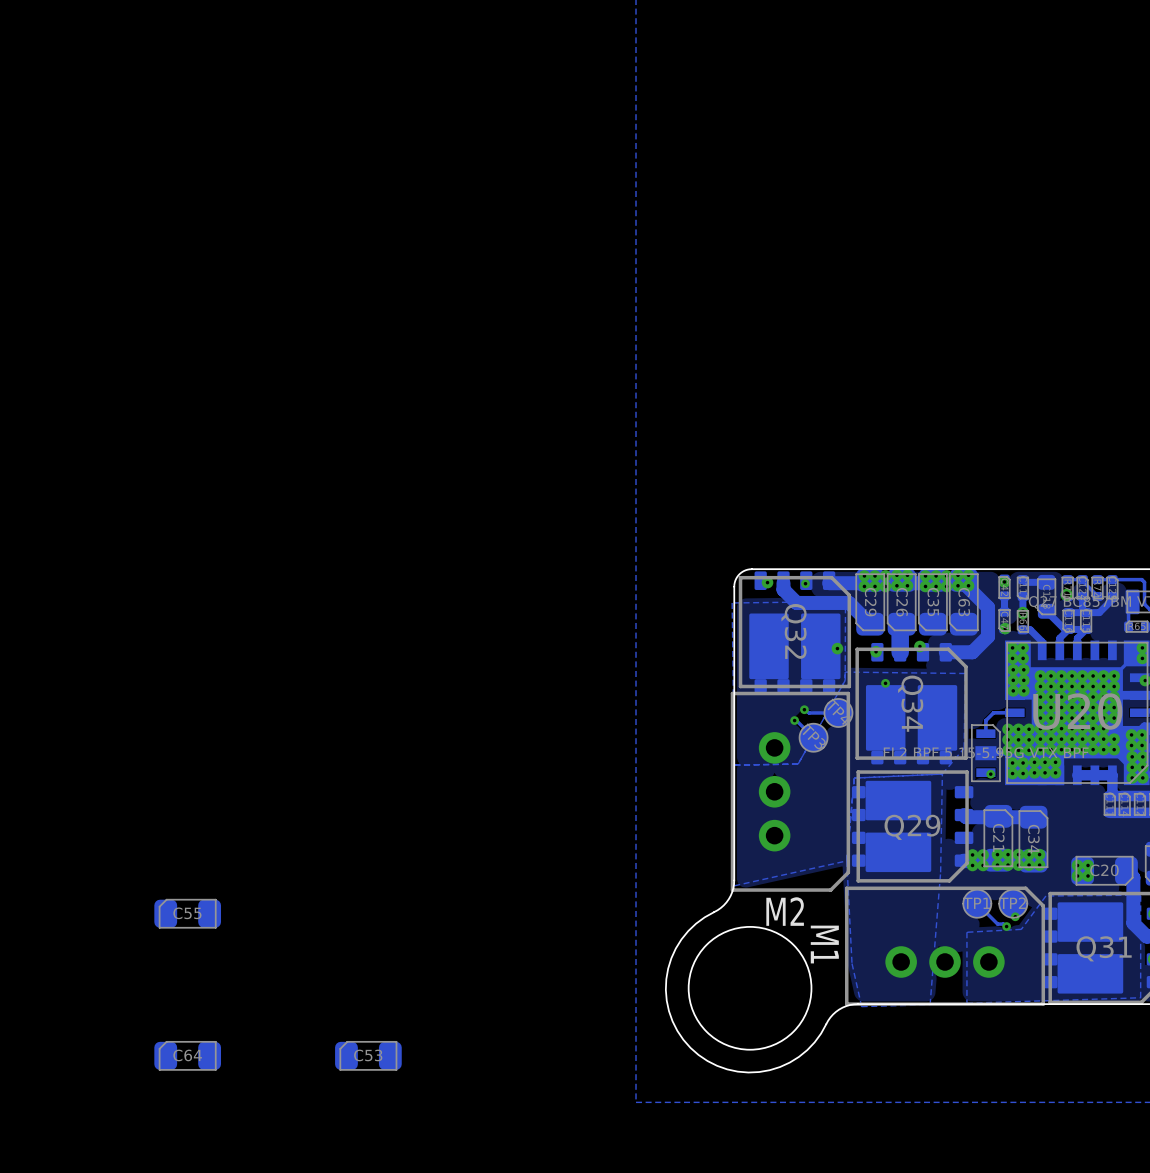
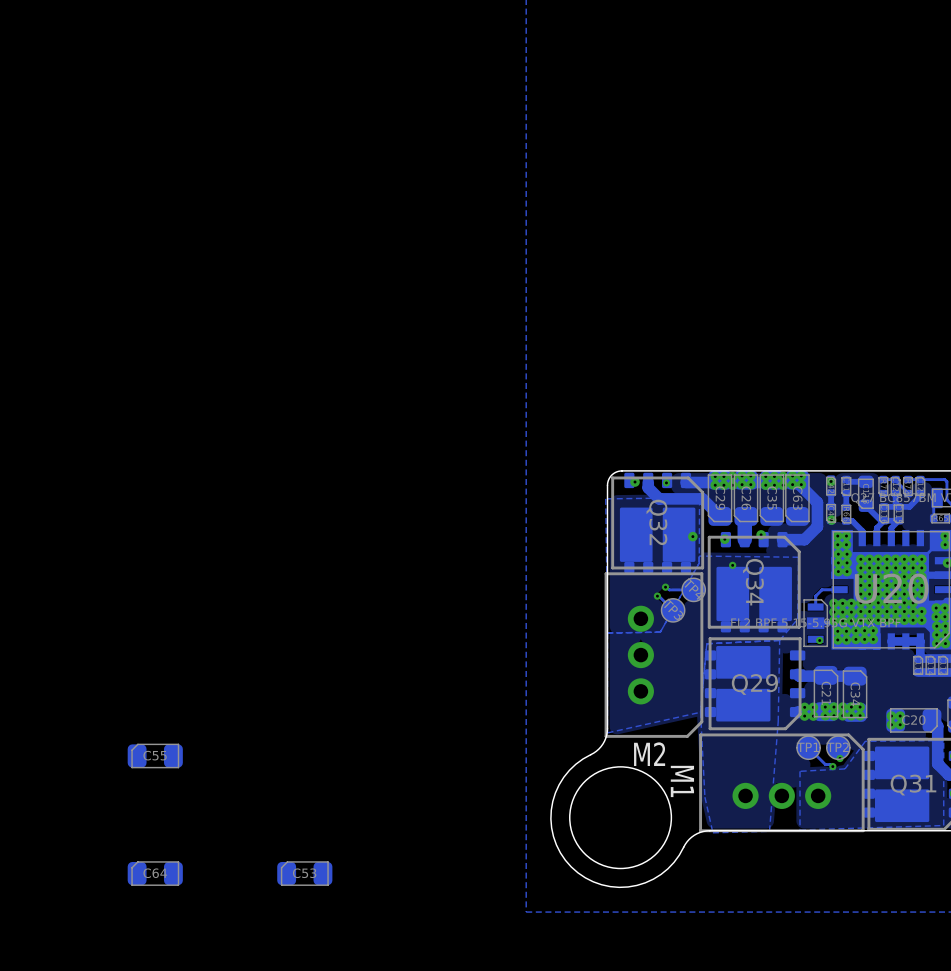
via: (1066, 594) -> none
via: (1022, 612) -> none

